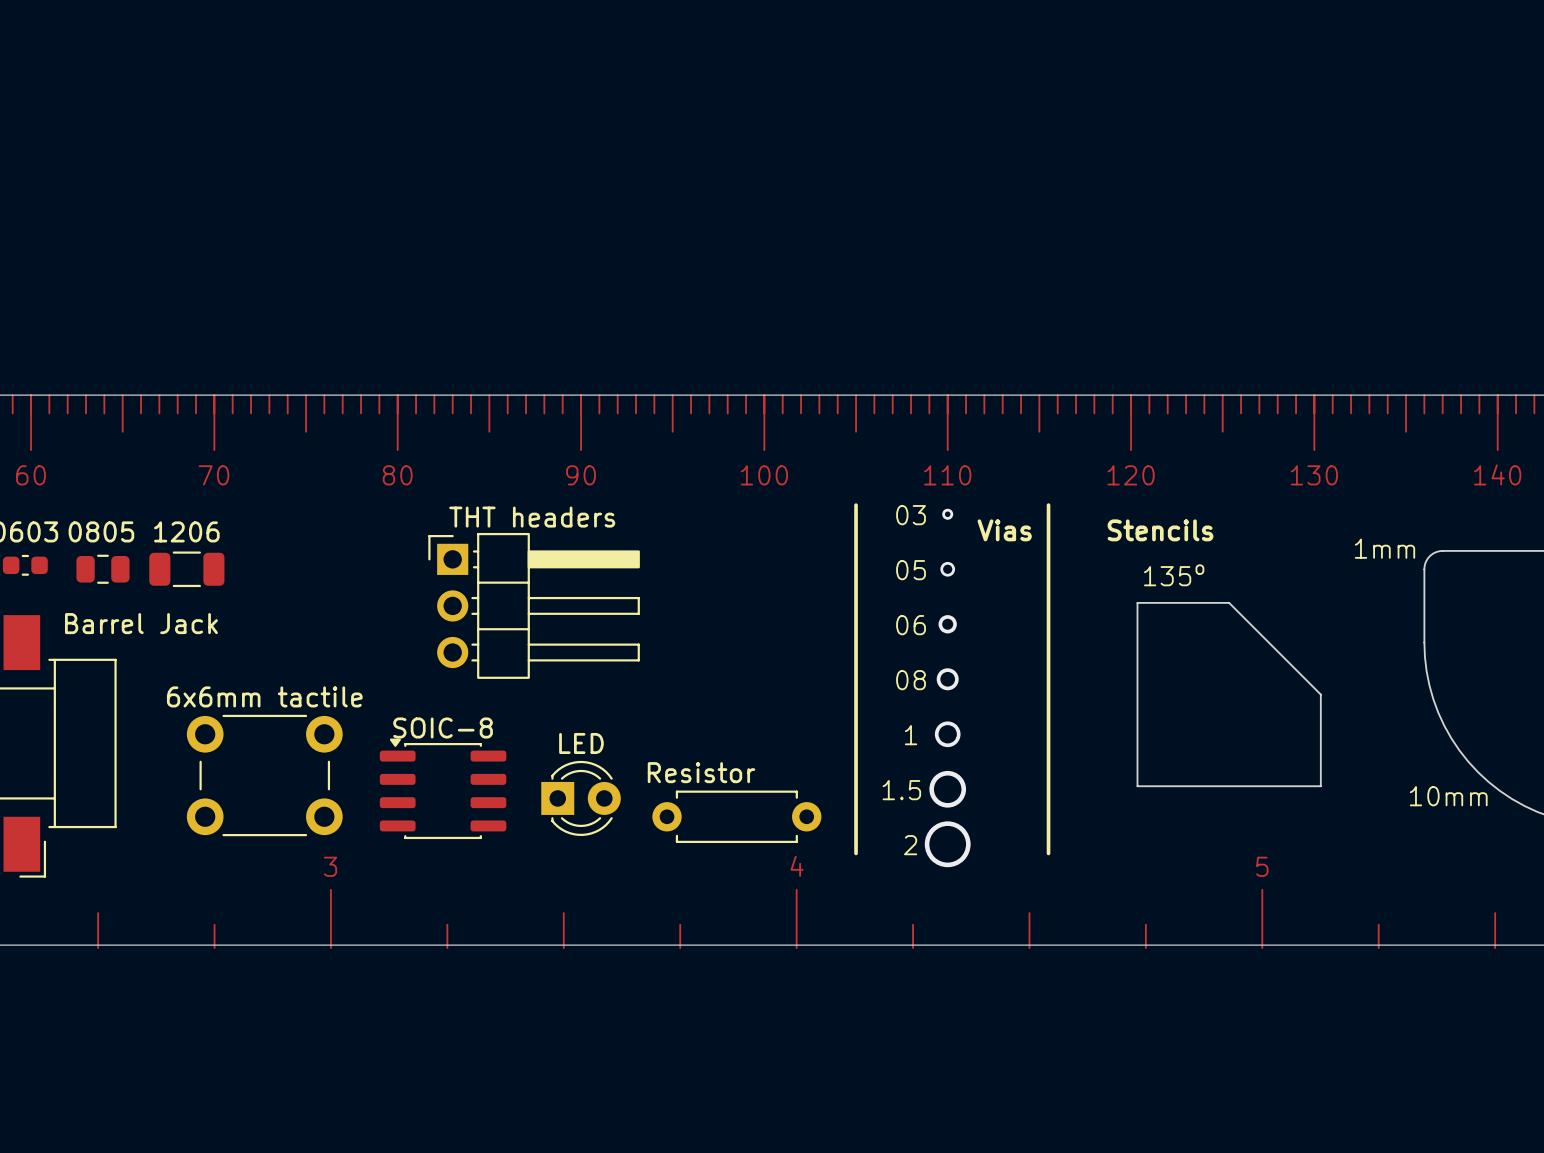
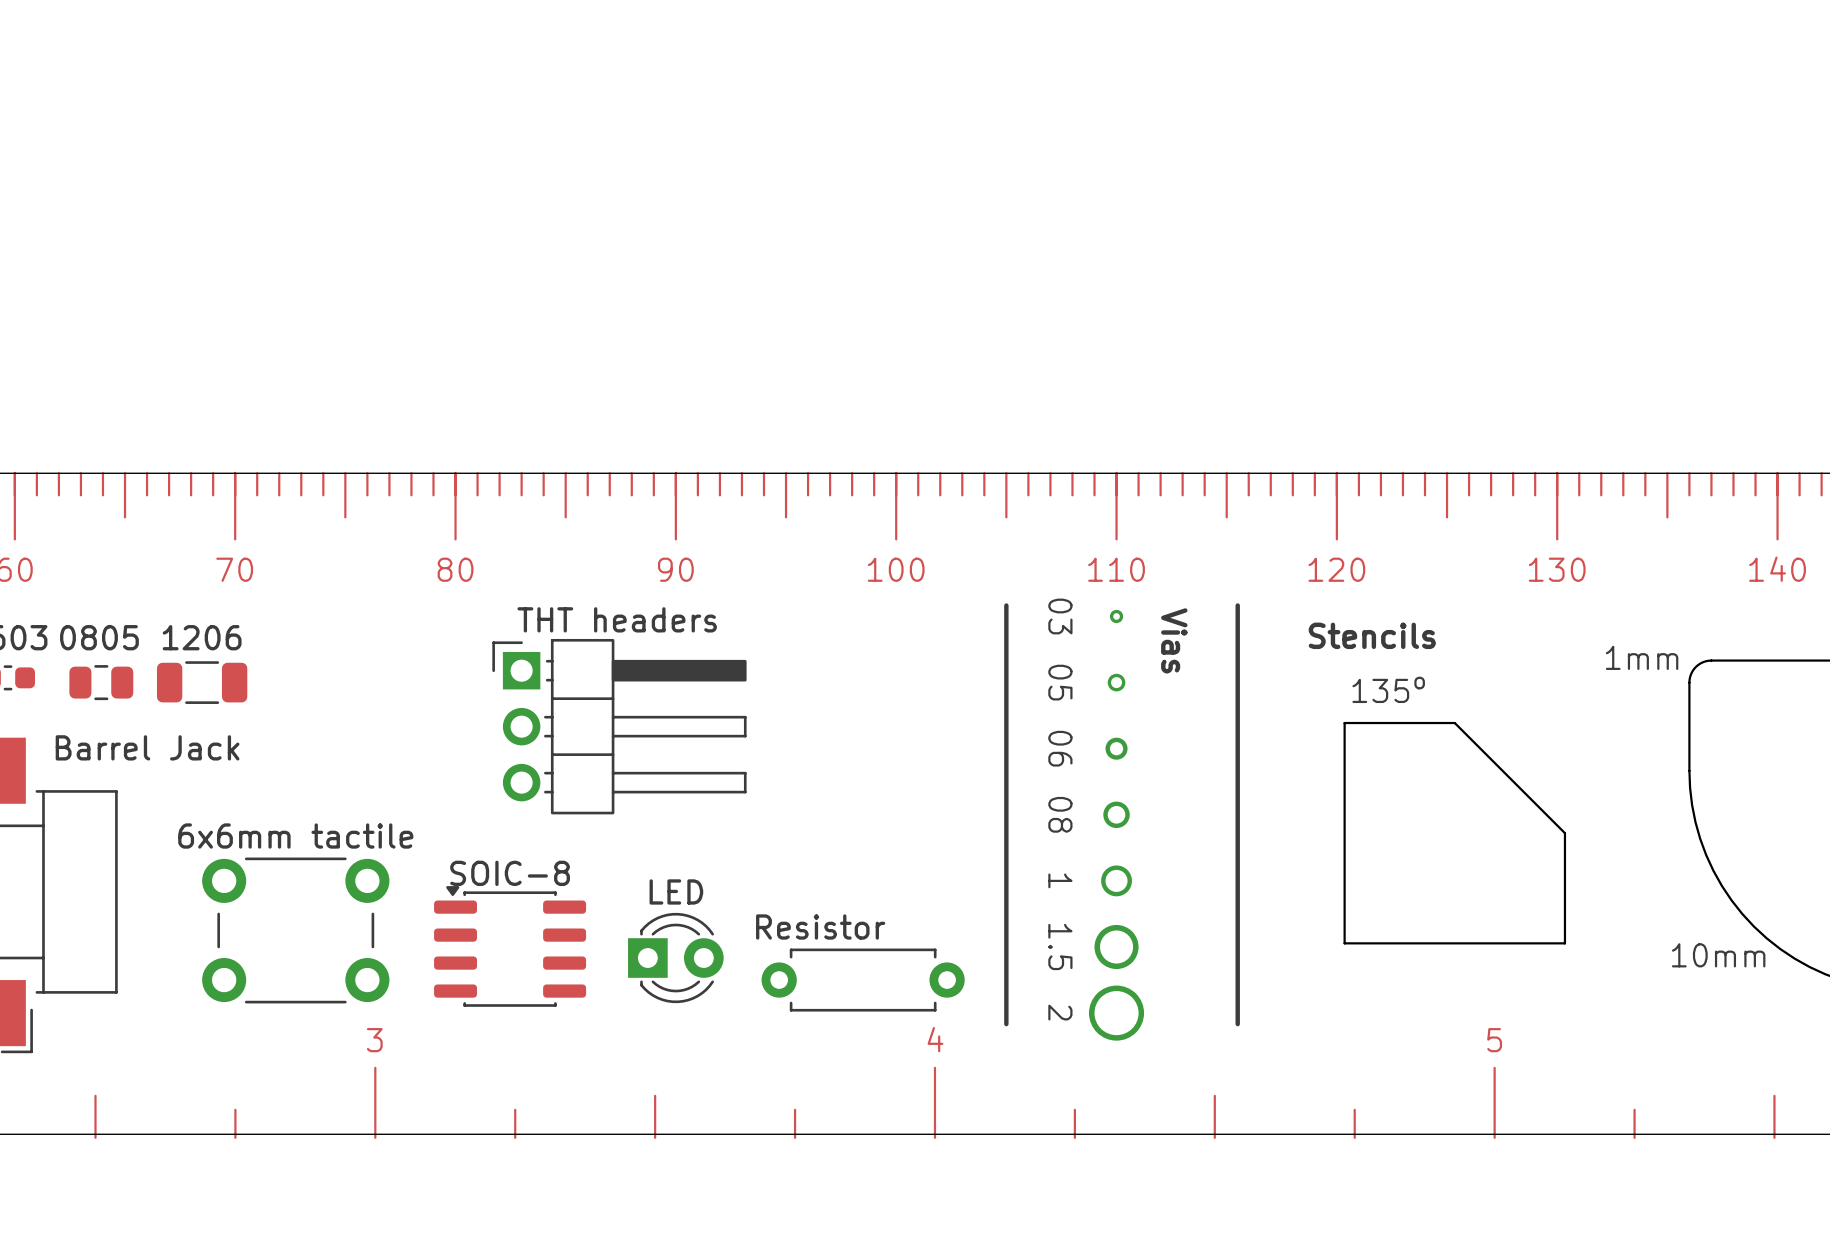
text rotation: 0° (911, 515) -> 90° clockwise (1060, 616)
text rotation: 0° (1004, 530) -> 90° clockwise (1174, 640)
text rotation: 0° (911, 570) -> 90° clockwise (1060, 682)
text rotation: 0° (911, 625) -> 90° clockwise (1060, 748)
text rotation: 0° (911, 680) -> 90° clockwise (1060, 814)
text rotation: 0° (911, 735) -> 90° clockwise (1060, 880)
text rotation: 0° (901, 790) -> 90° clockwise (1060, 947)
text rotation: 0° (910, 845) -> 90° clockwise (1060, 1012)

